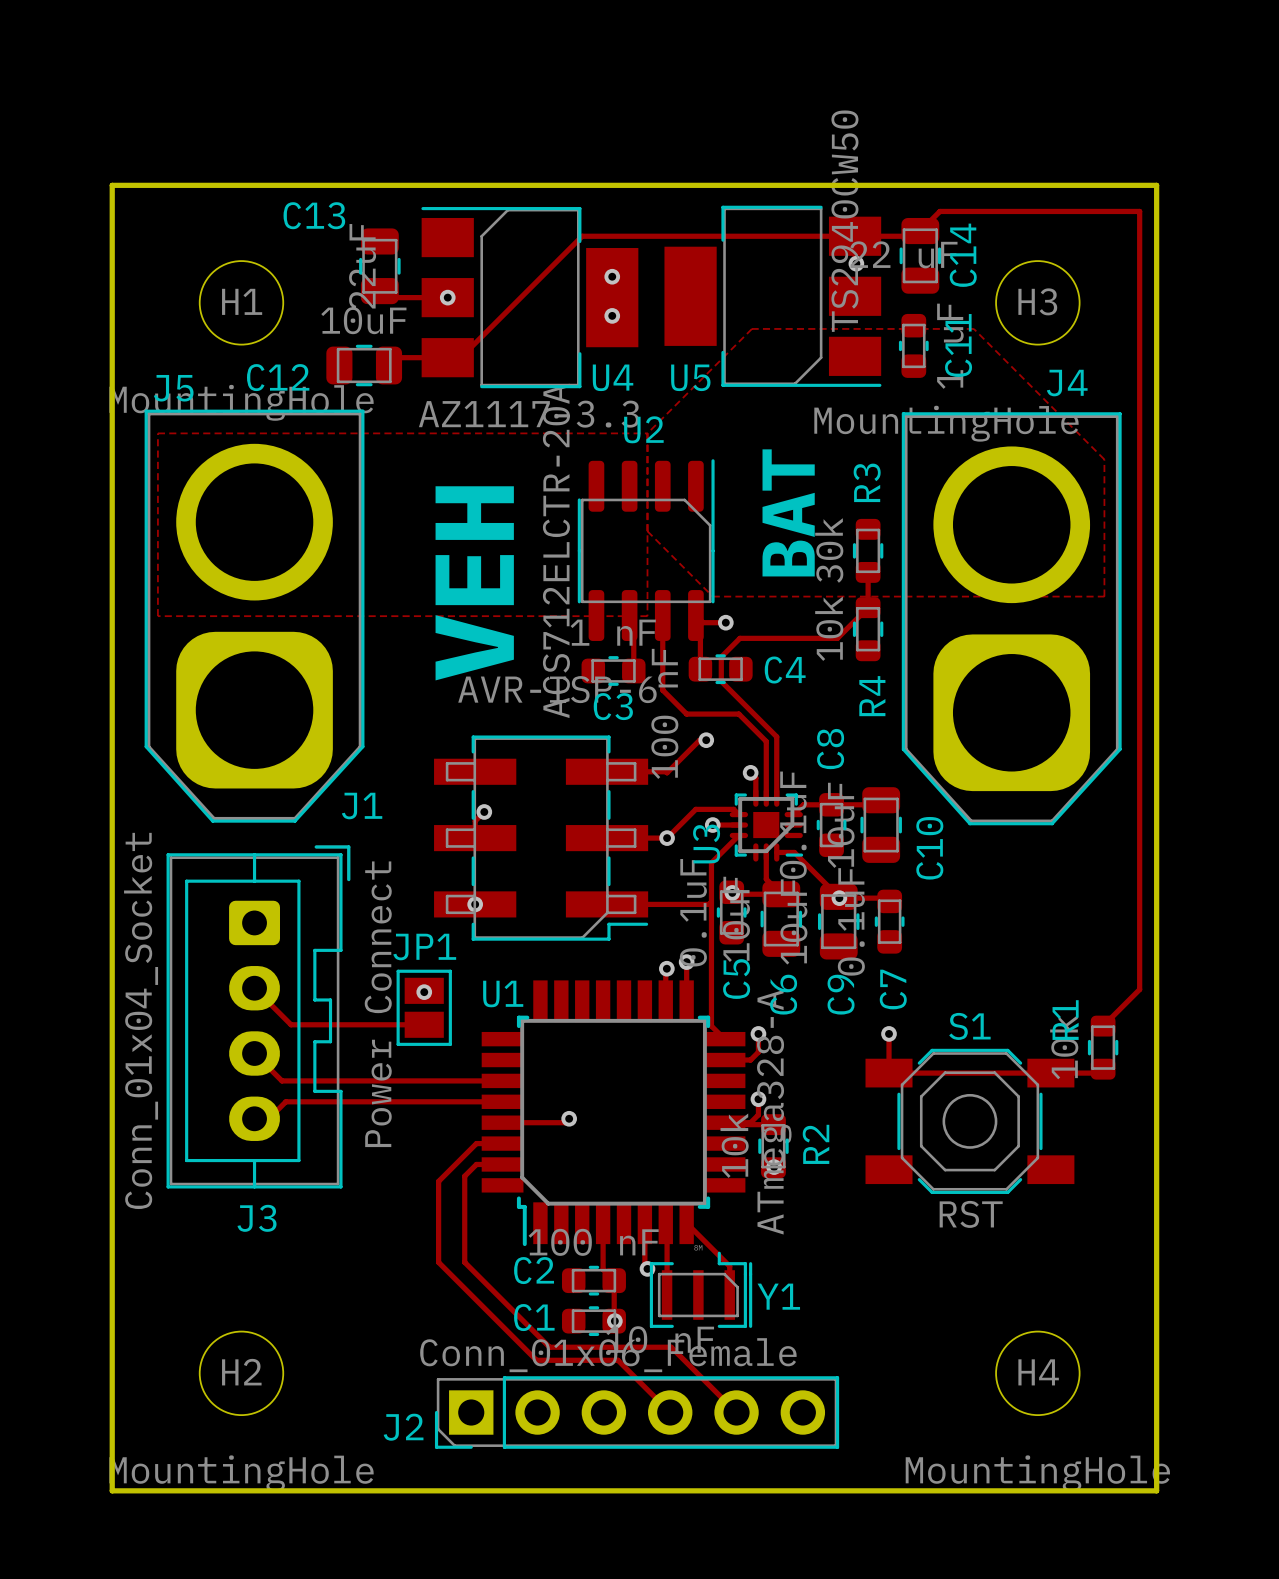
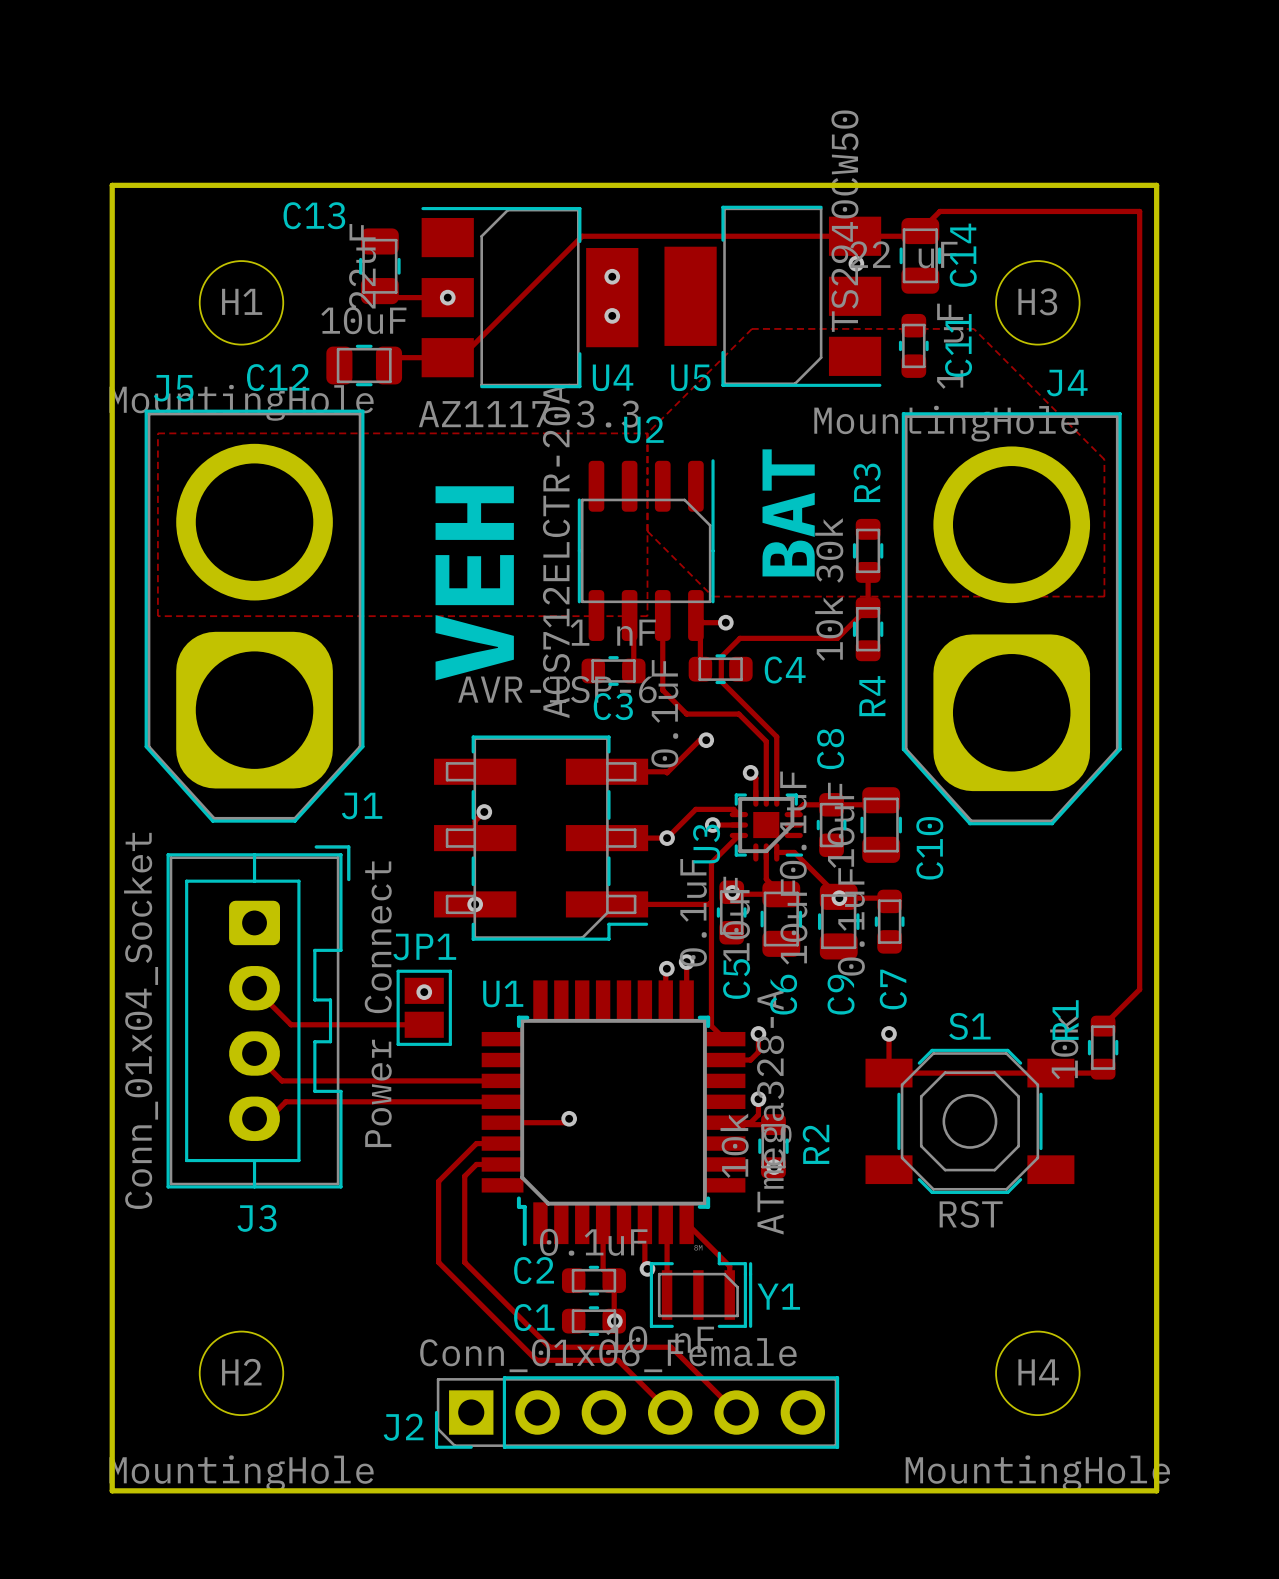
C4 value: 100 nF (664, 713) -> 0.1uF (664, 713)
C2 value: 100 nF (593, 1242) -> 0.1uF (593, 1242)

